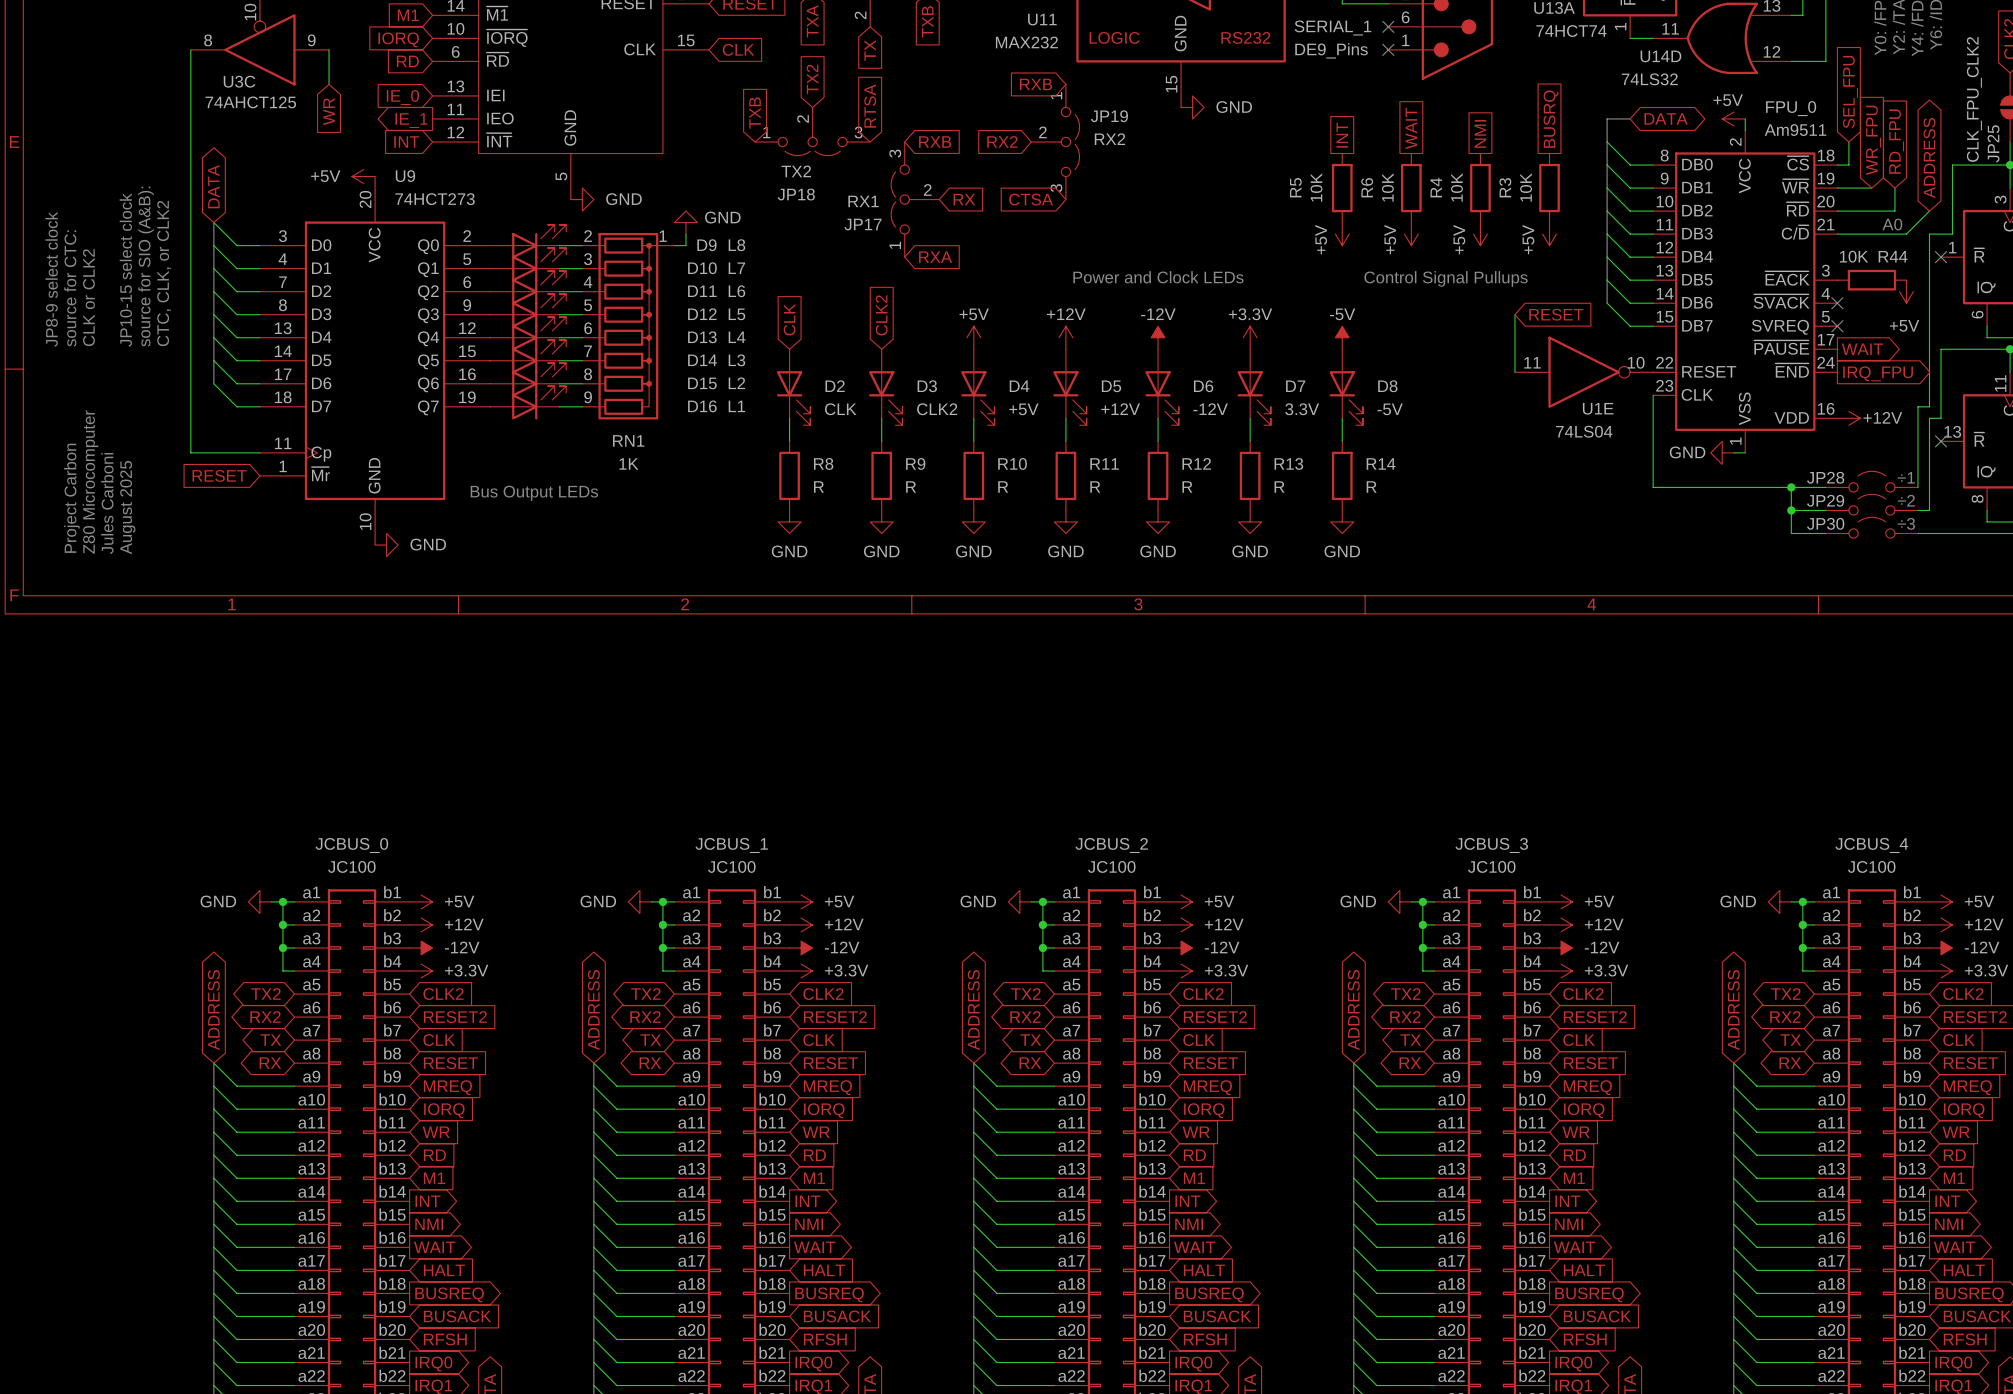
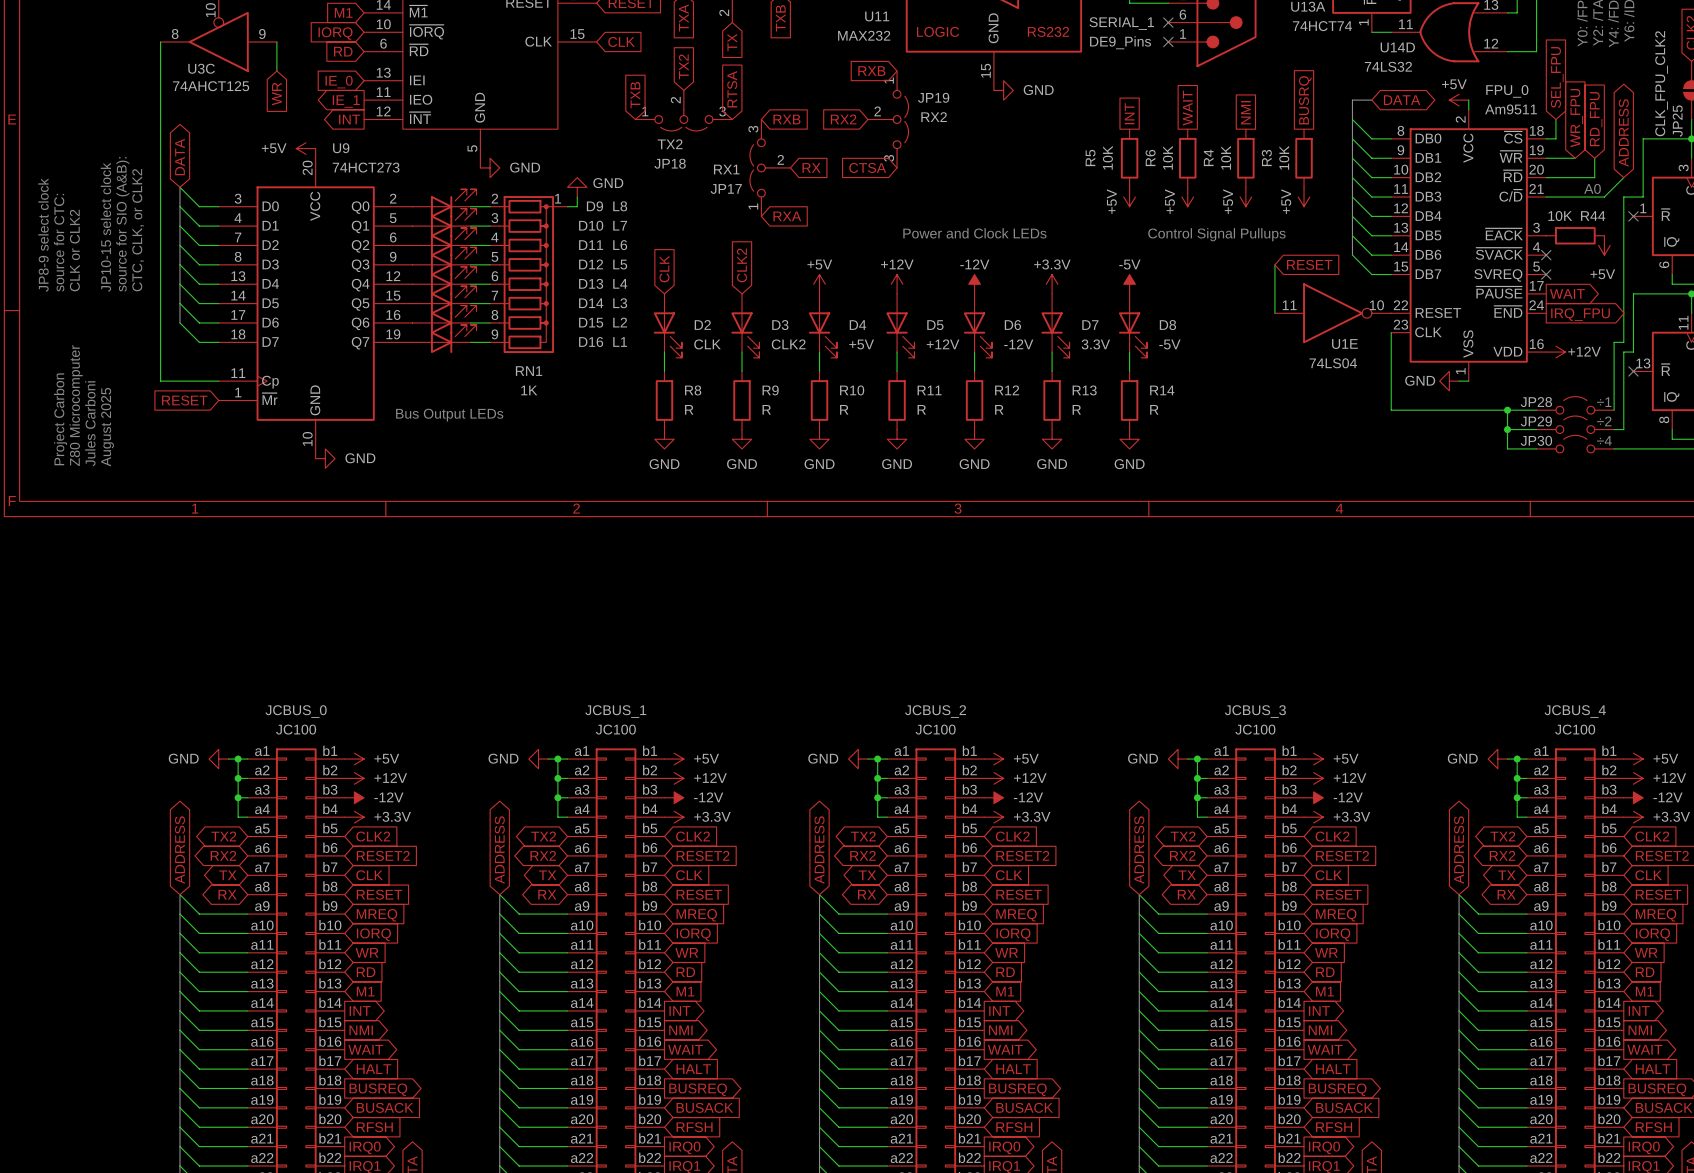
global label shape: input (406, 141) -> output (349, 119)
text: ÷3 (1906, 523) -> ÷4 (1604, 440)

